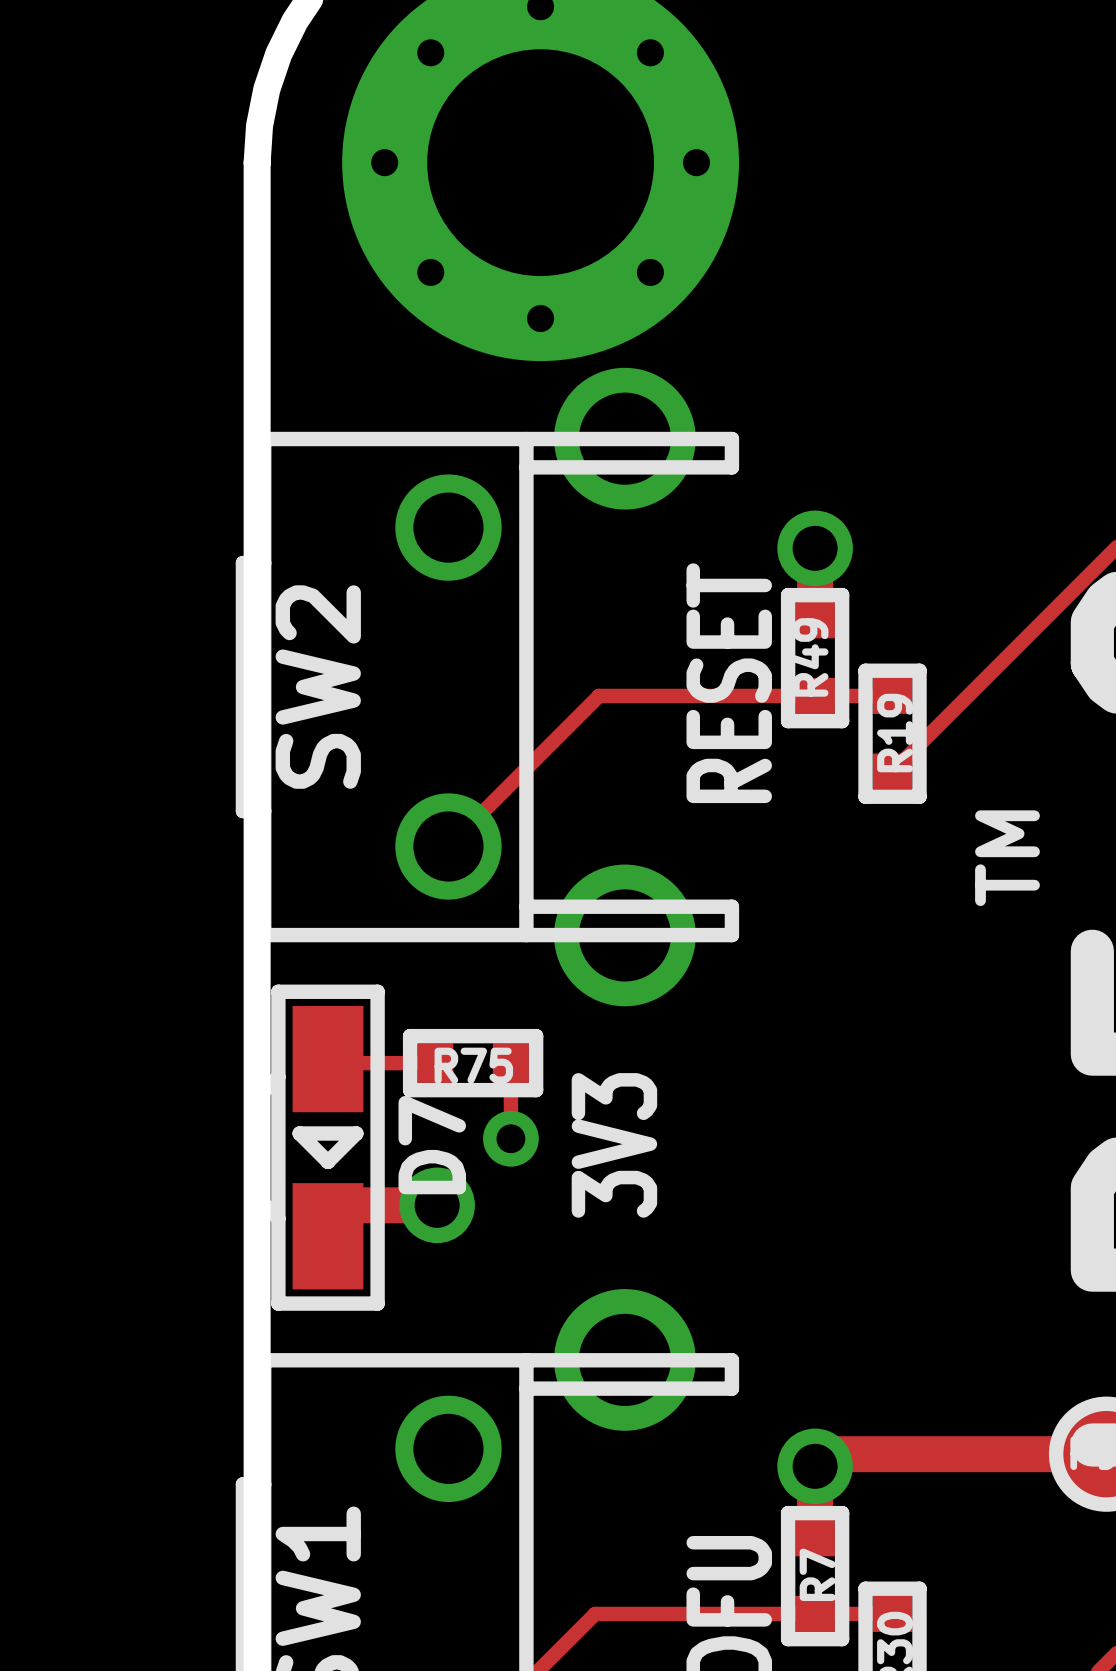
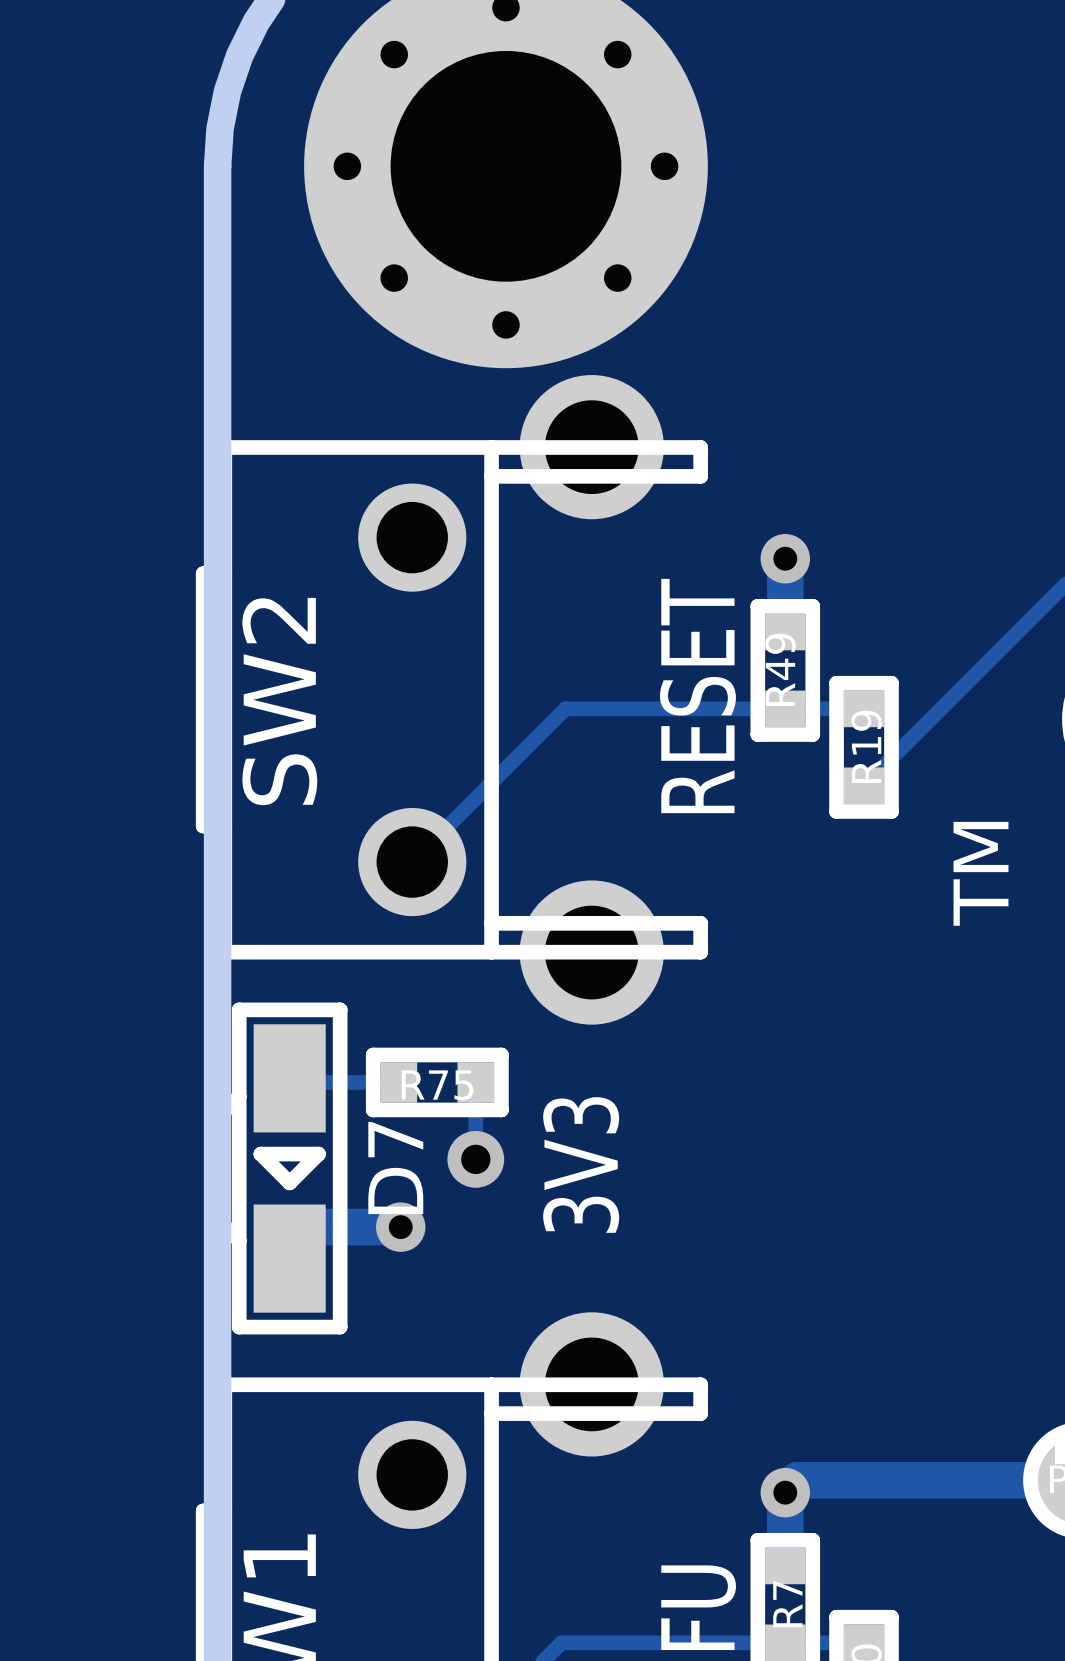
via size: [777, 510, 853, 587] -> [760, 534, 811, 584]
via size: [399, 1167, 475, 1244] -> [375, 1202, 426, 1252]
via size: [777, 1428, 853, 1505] -> [760, 1467, 811, 1518]

